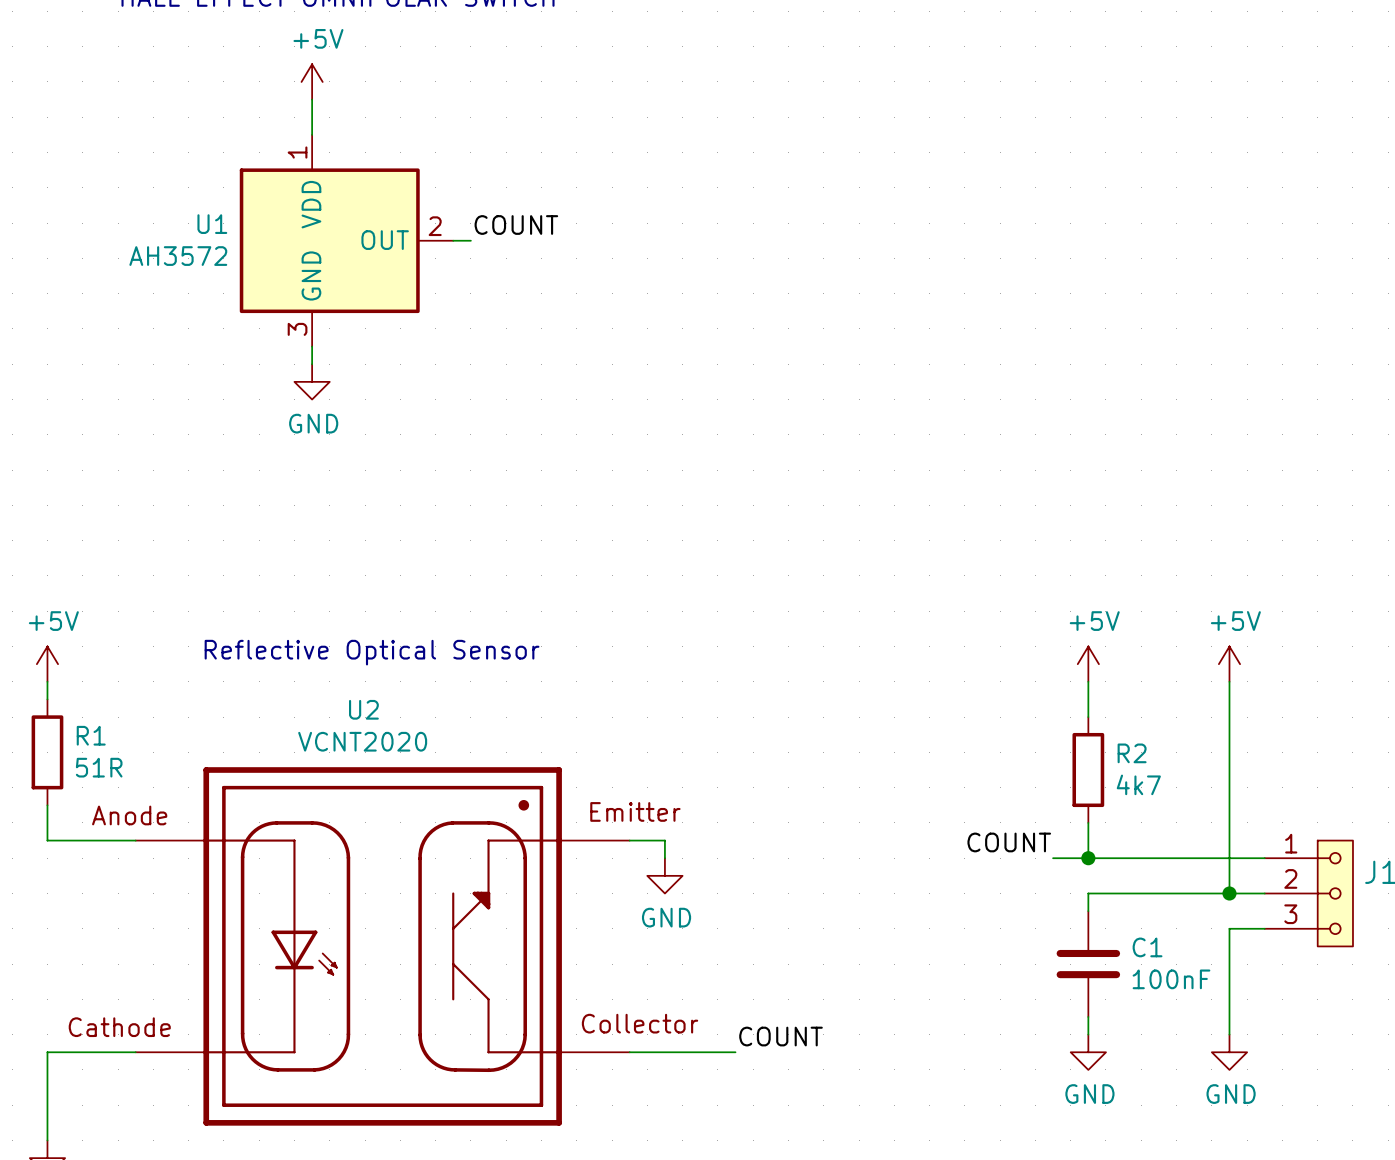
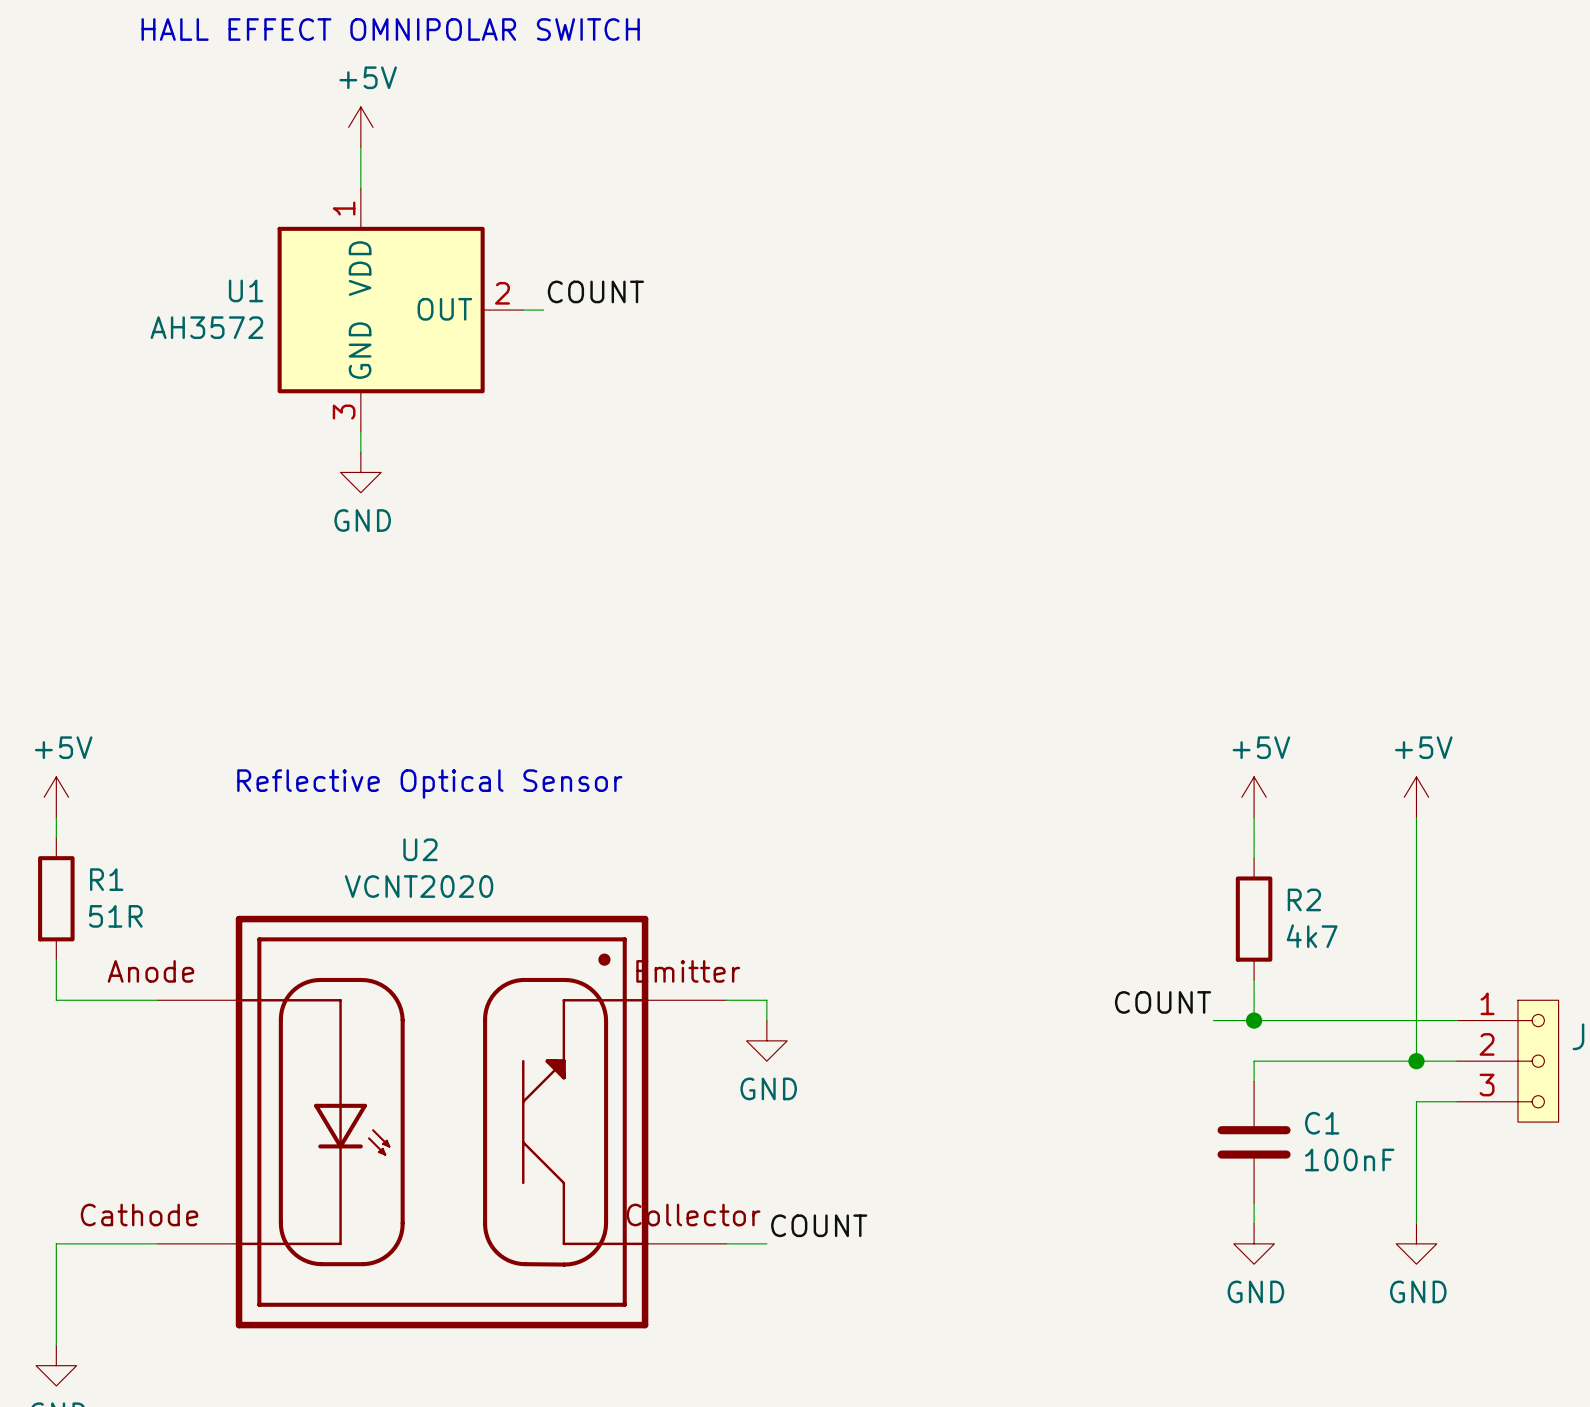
U2 text position: Emitter (635, 811) -> Emitter (688, 971)
U2 text position: Collector (640, 1023) -> Collector (693, 1215)
label position: COUNT (781, 1036) -> COUNT (819, 1225)
wire: (664, 1052) (735, 1052) -> none

